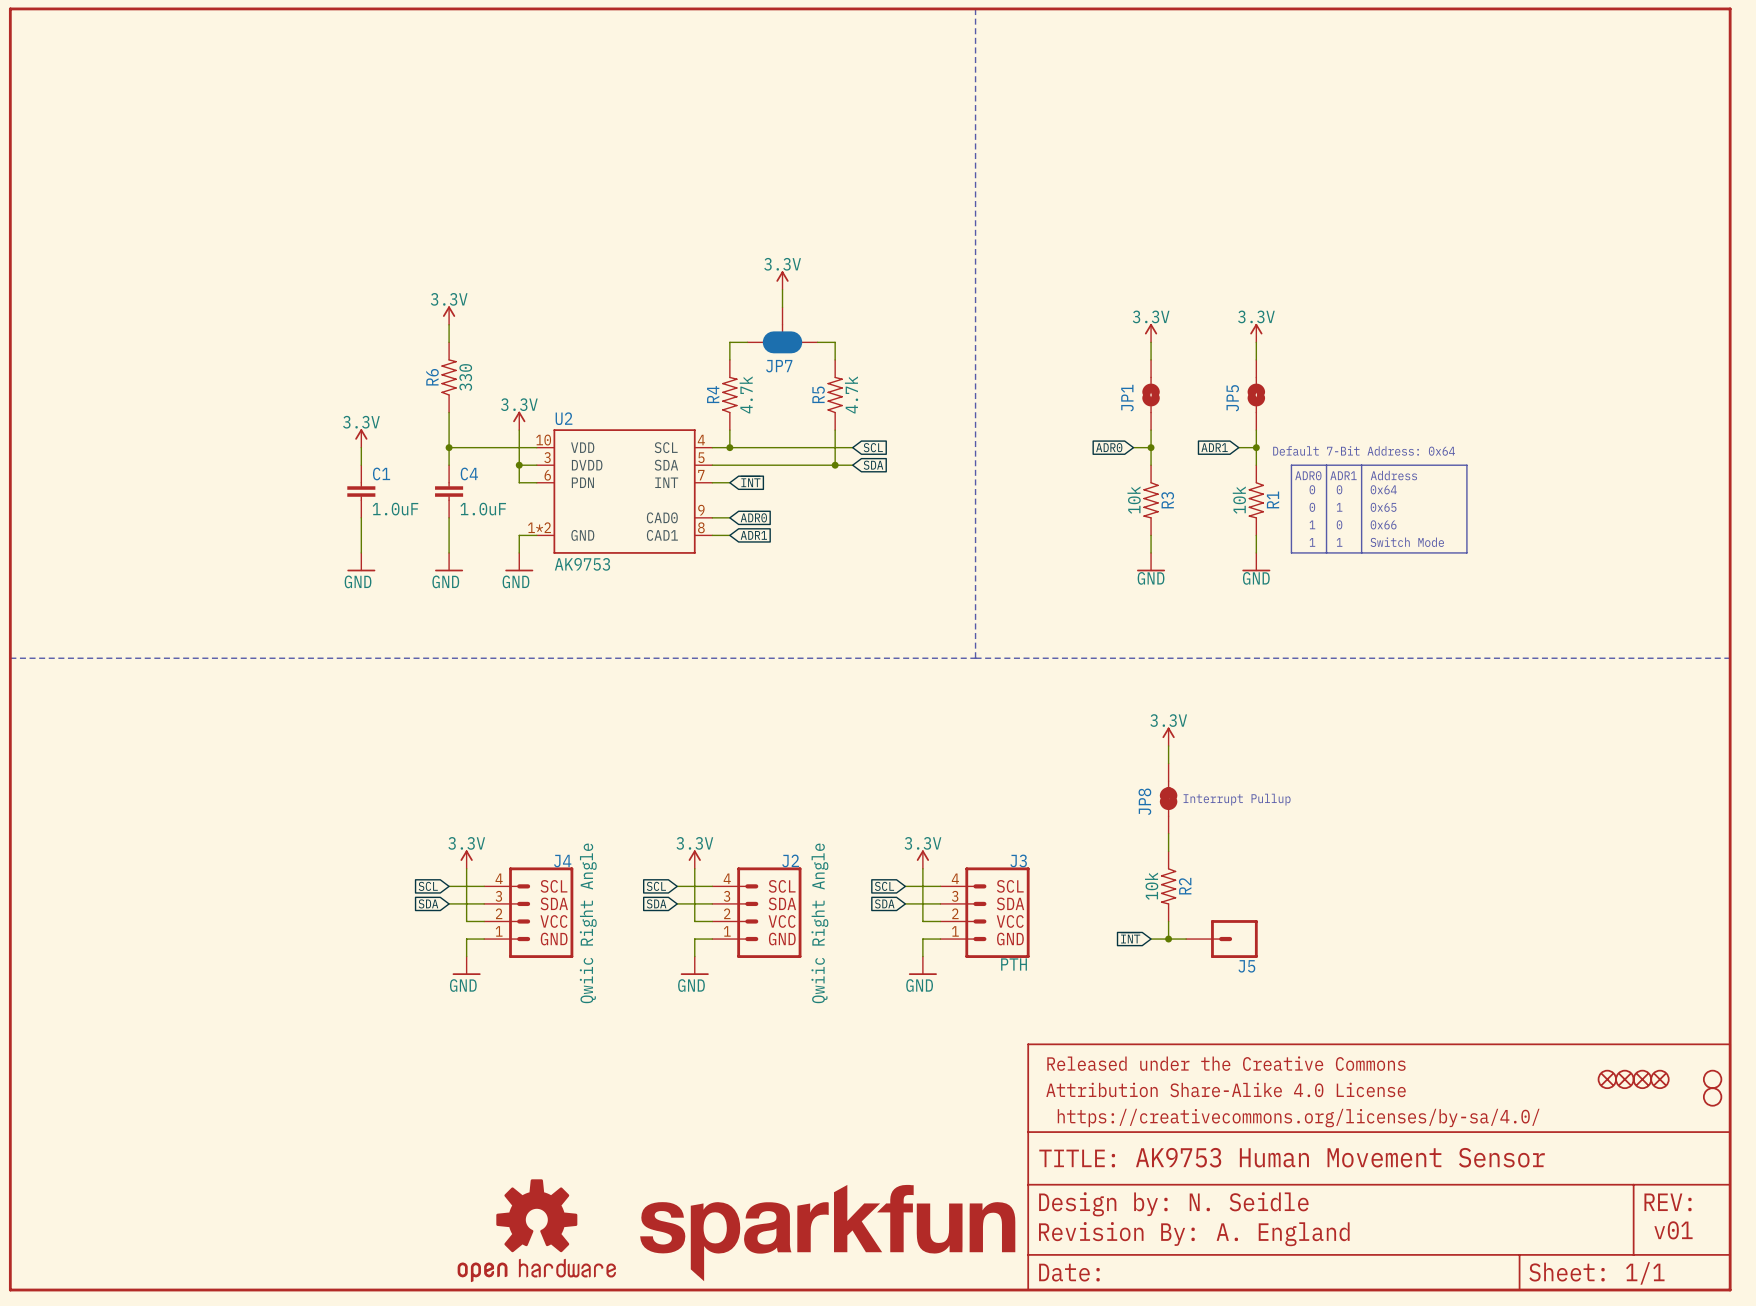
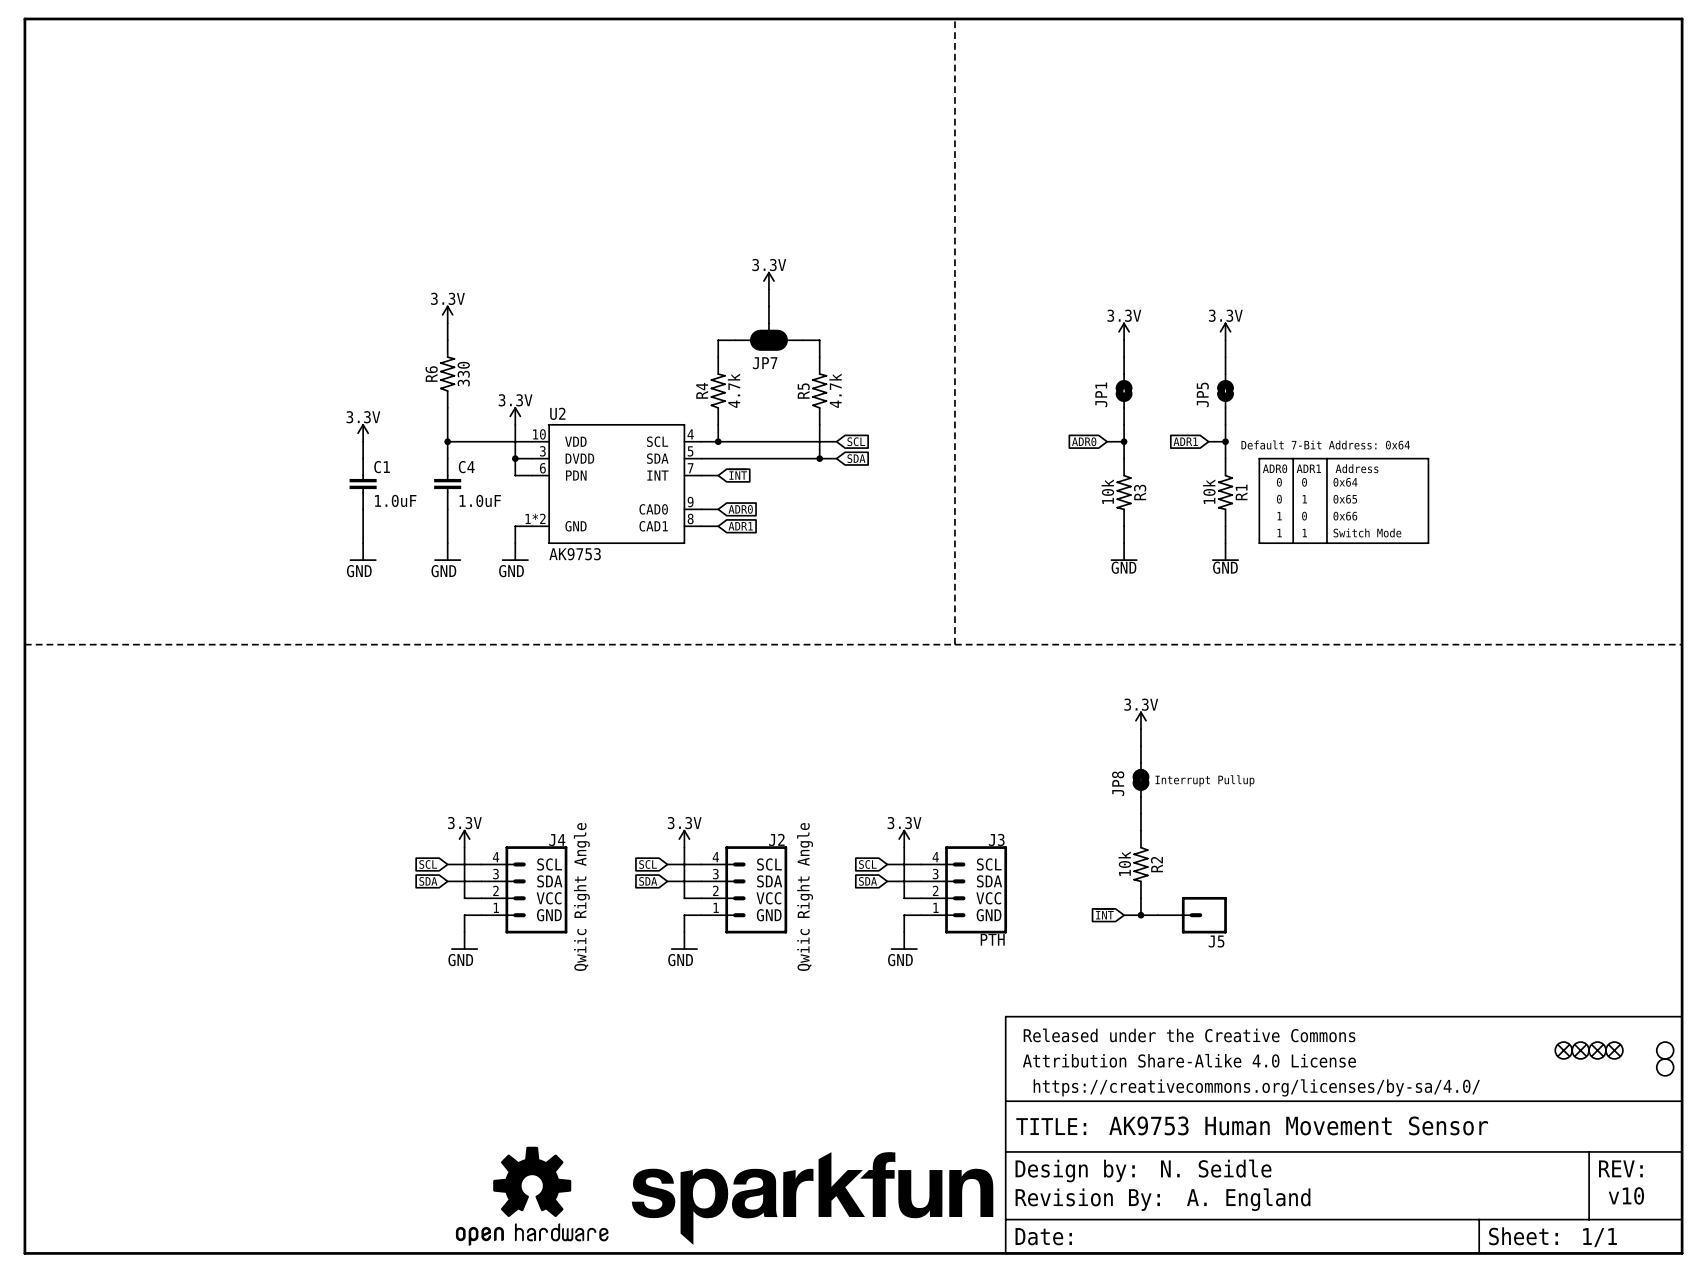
text: v01 (1673, 1230) -> v10 (1626, 1195)

